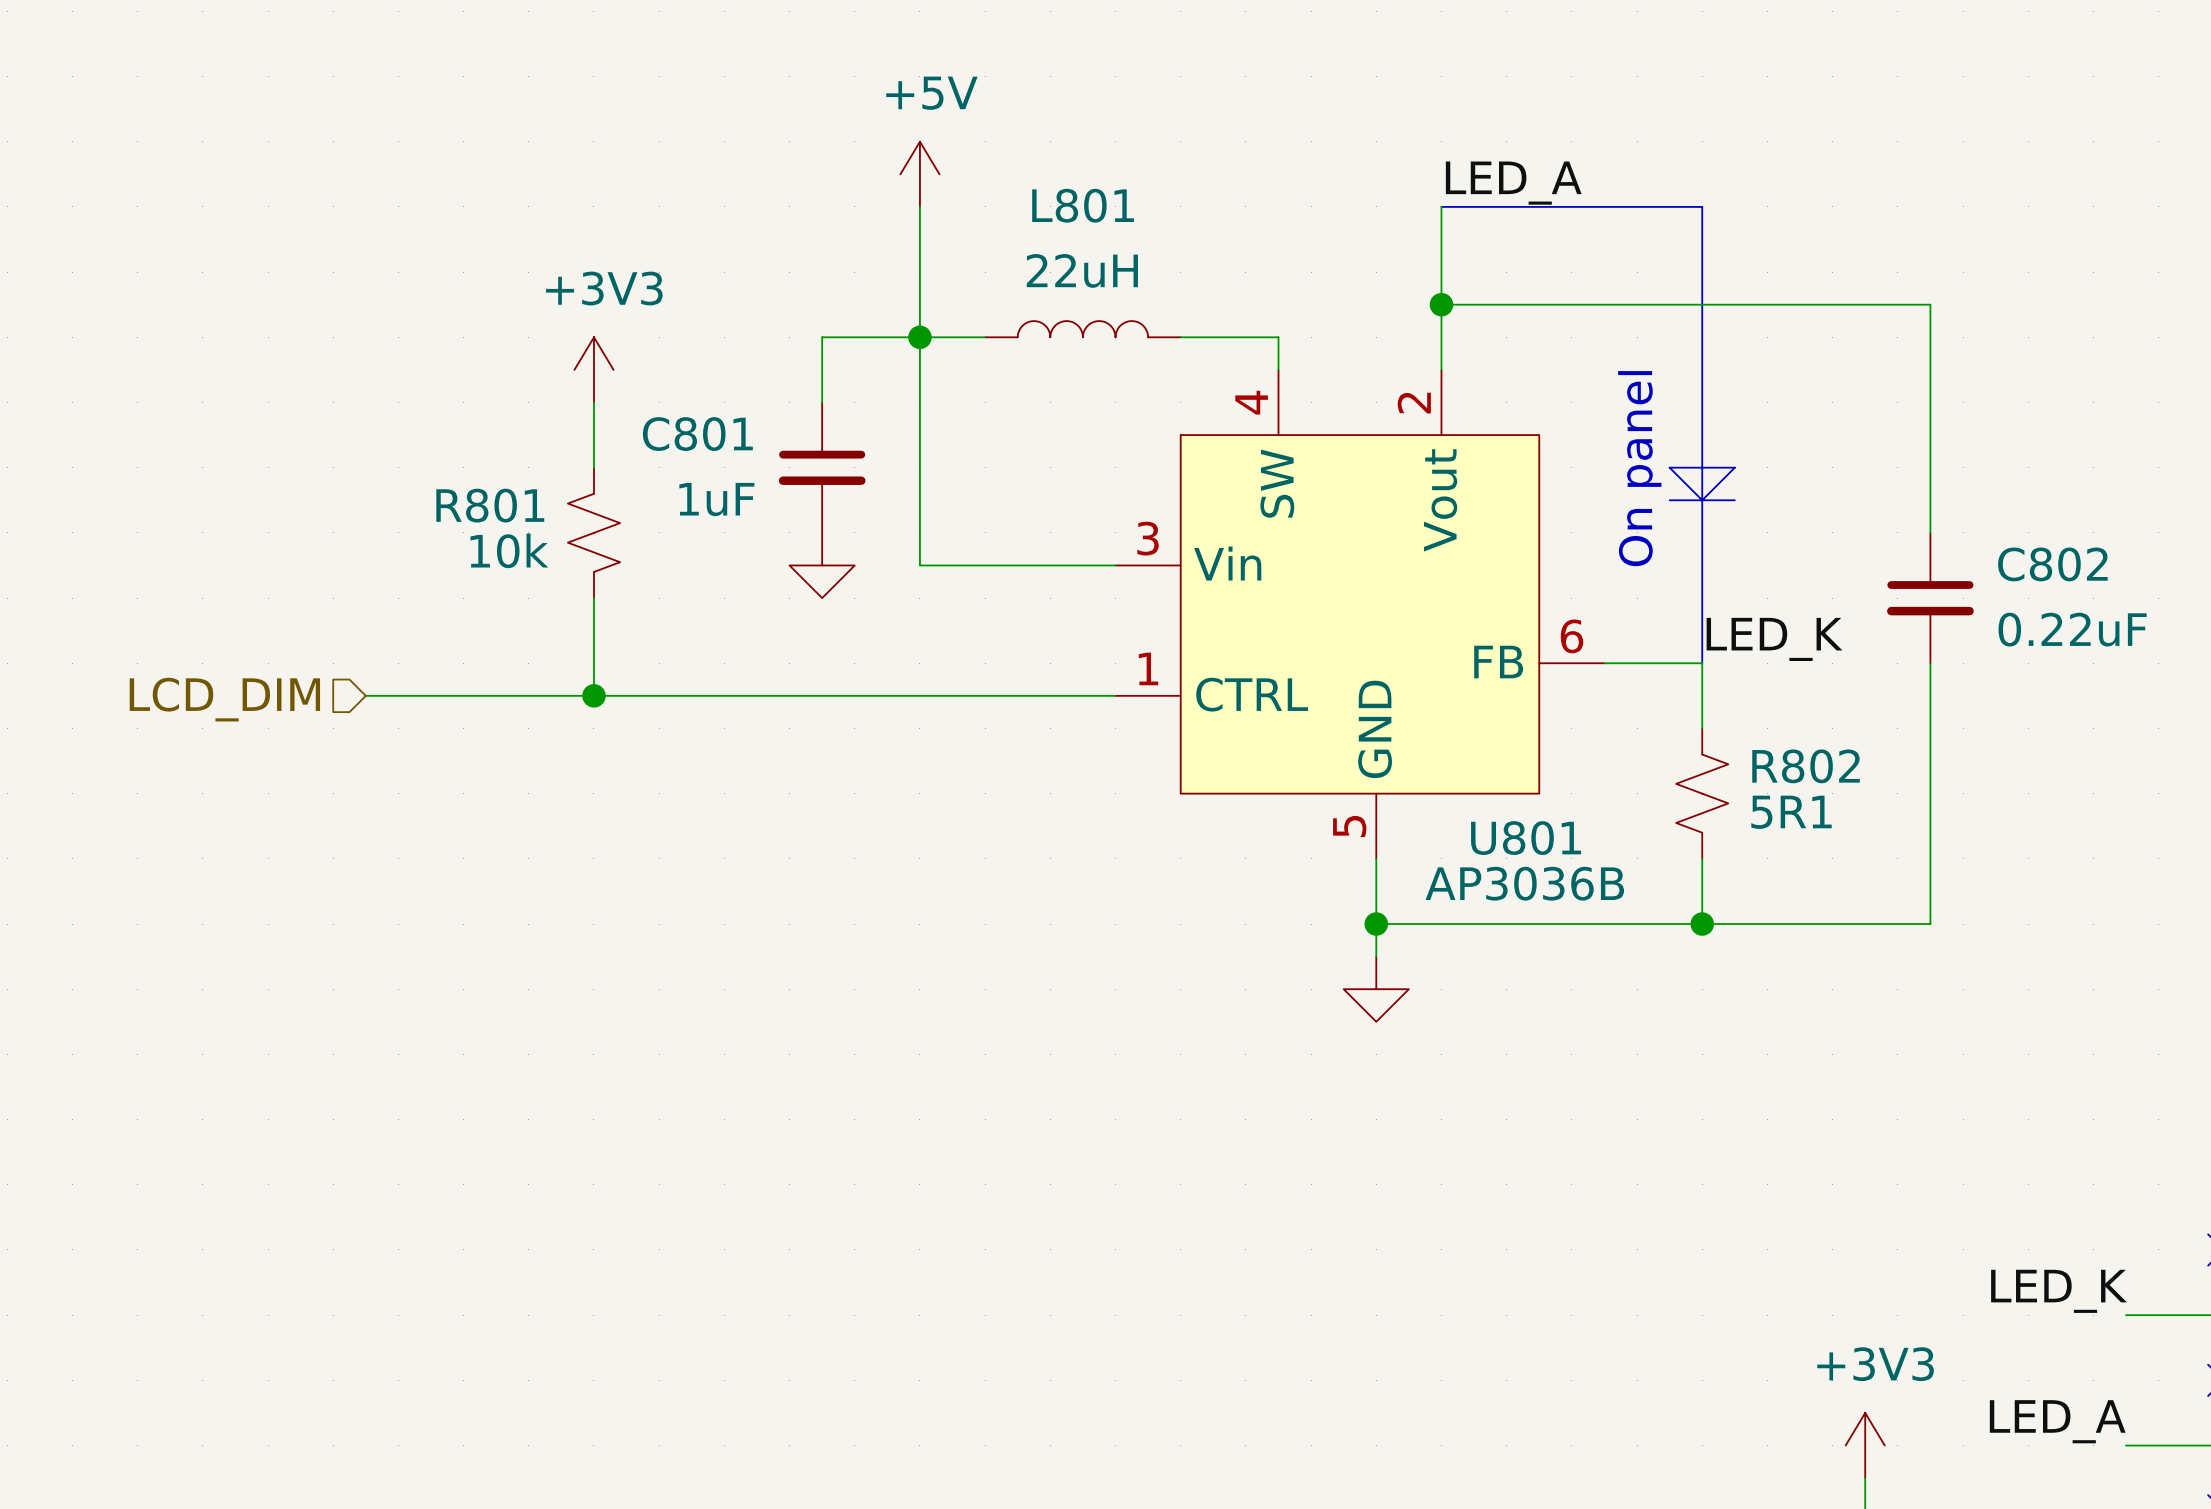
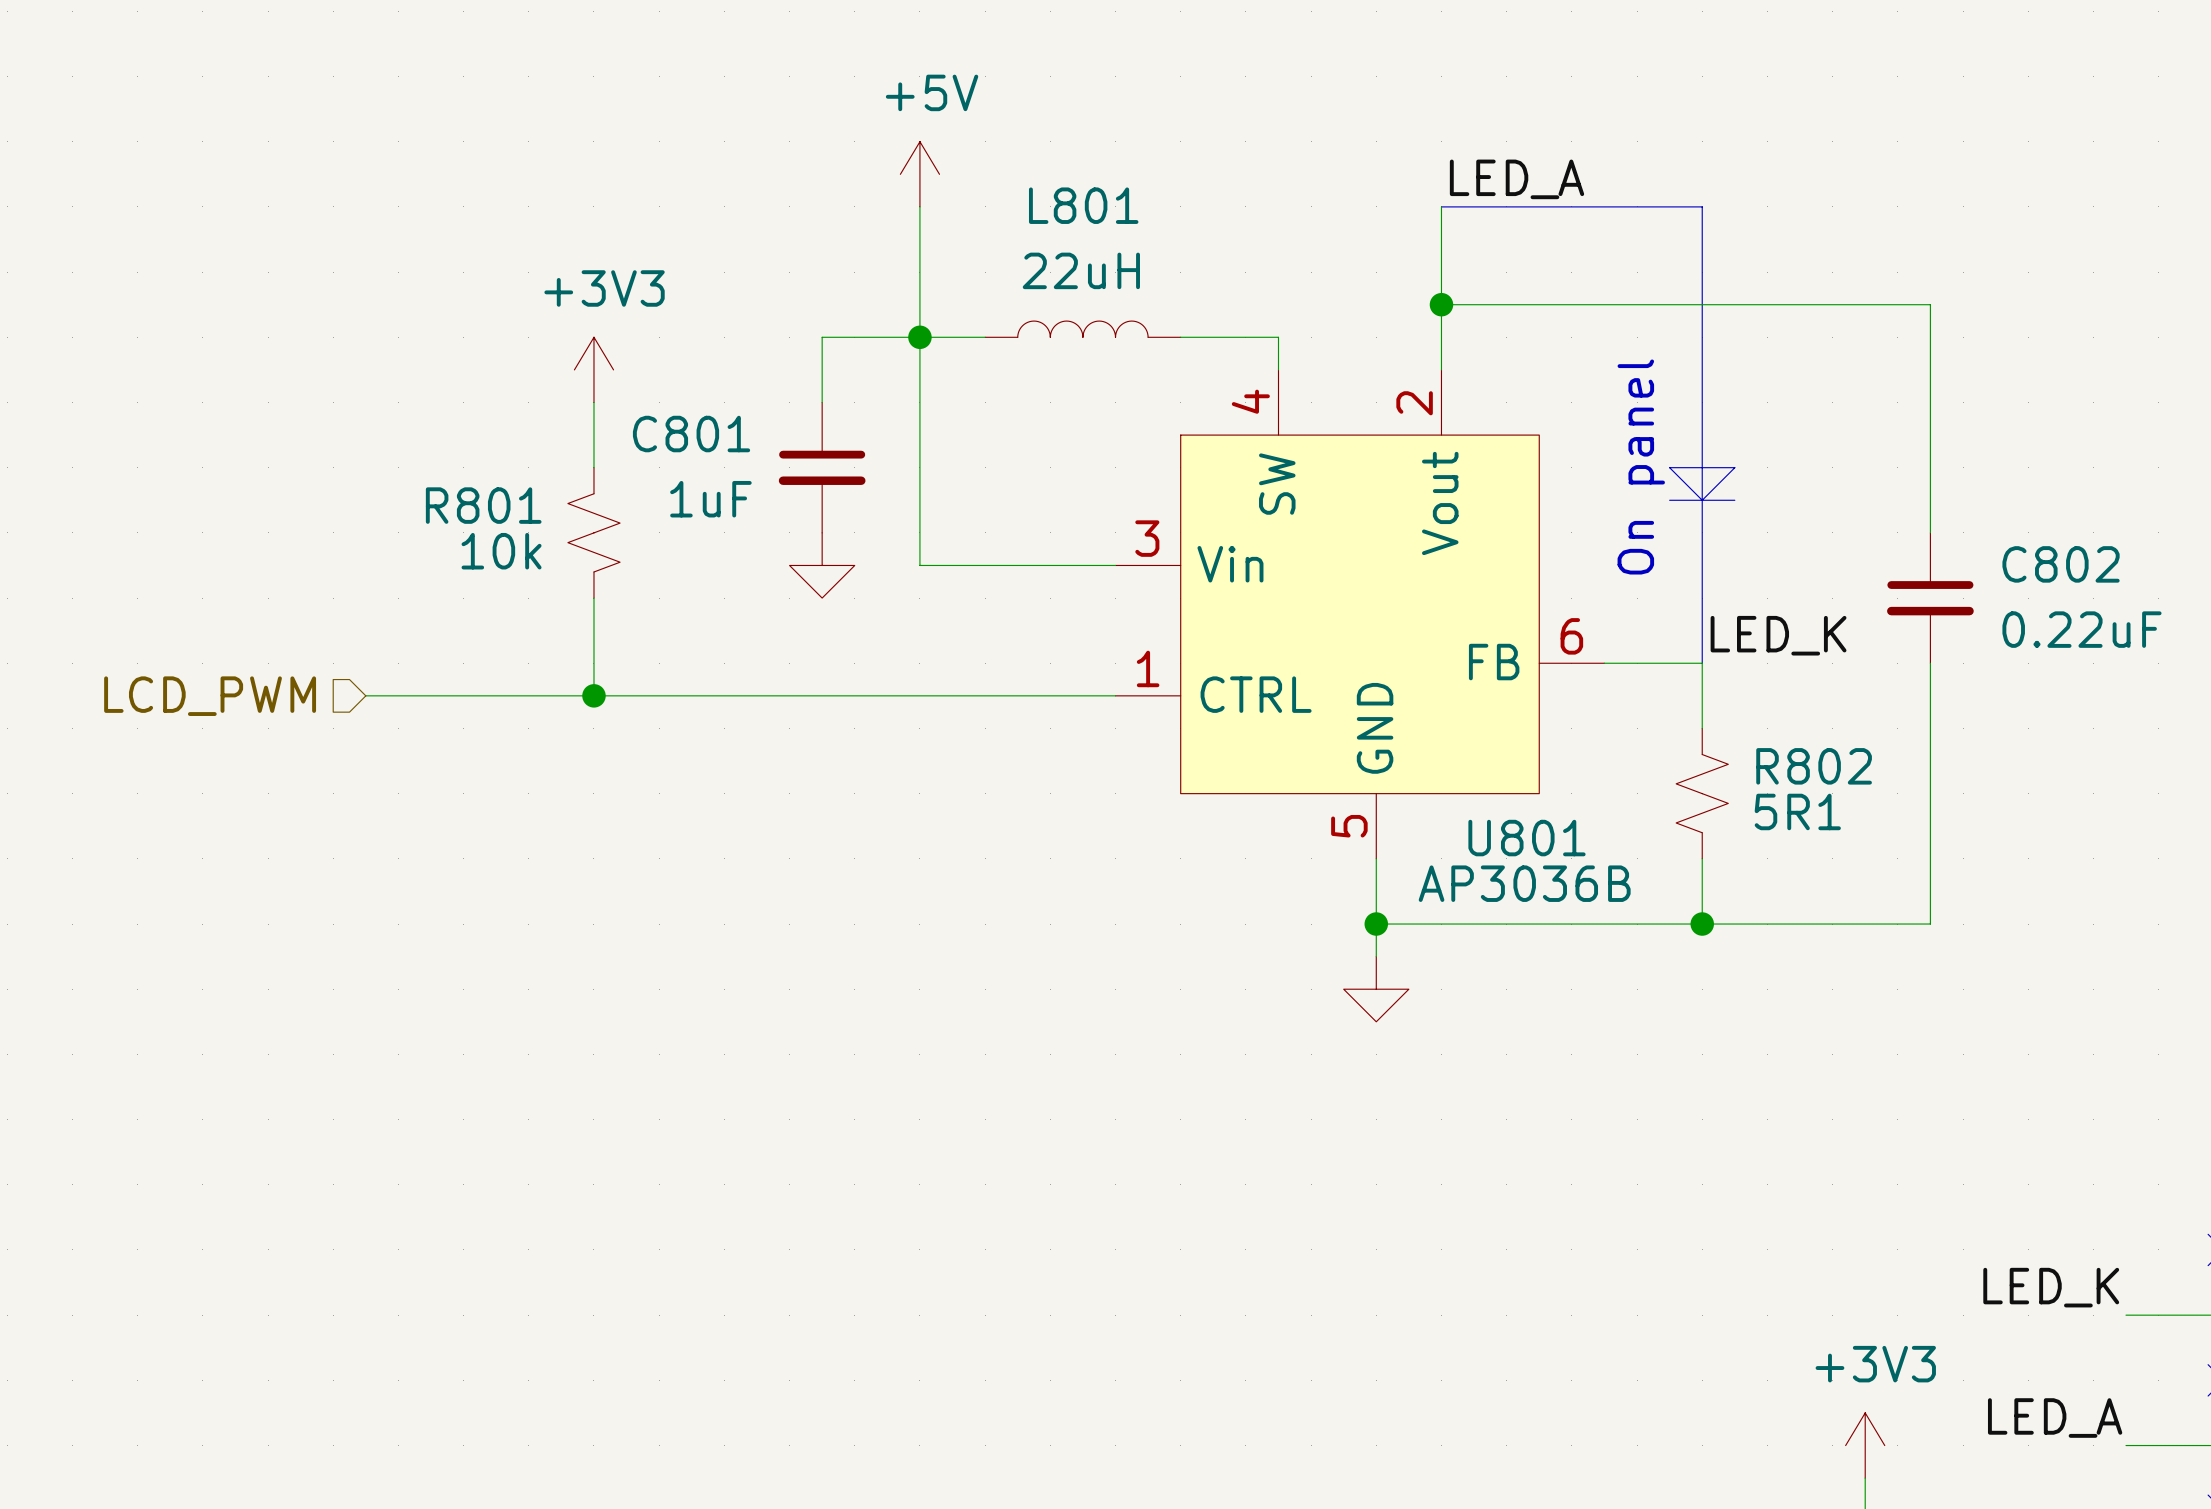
hierarchical label: LCD_DIM (224, 699) -> LCD_PWM (210, 696)

